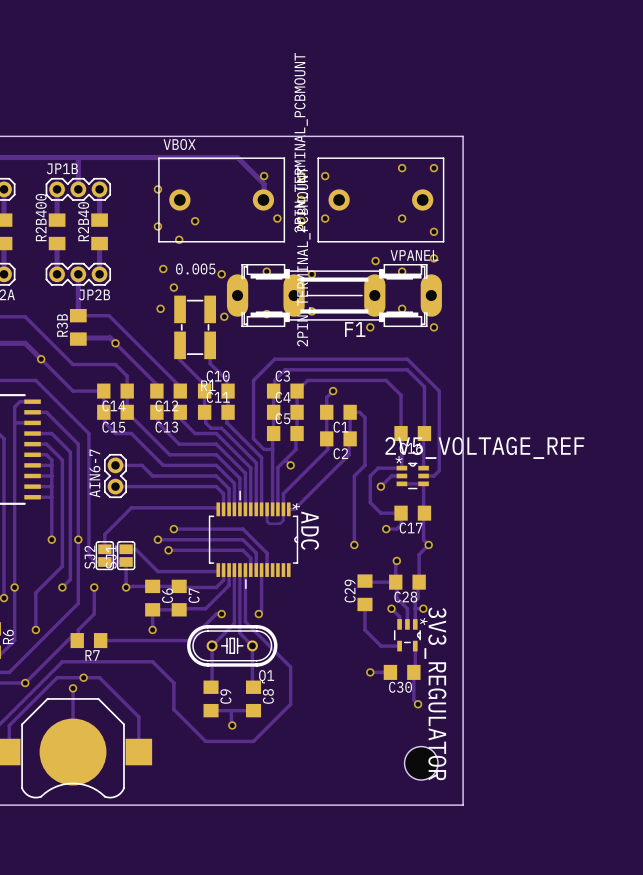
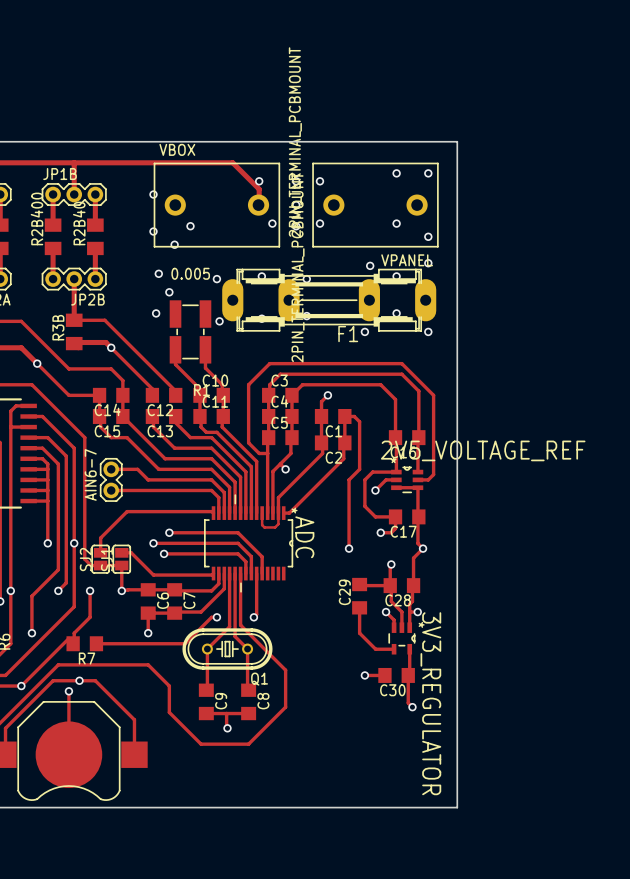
hole: (421, 763) -> none

